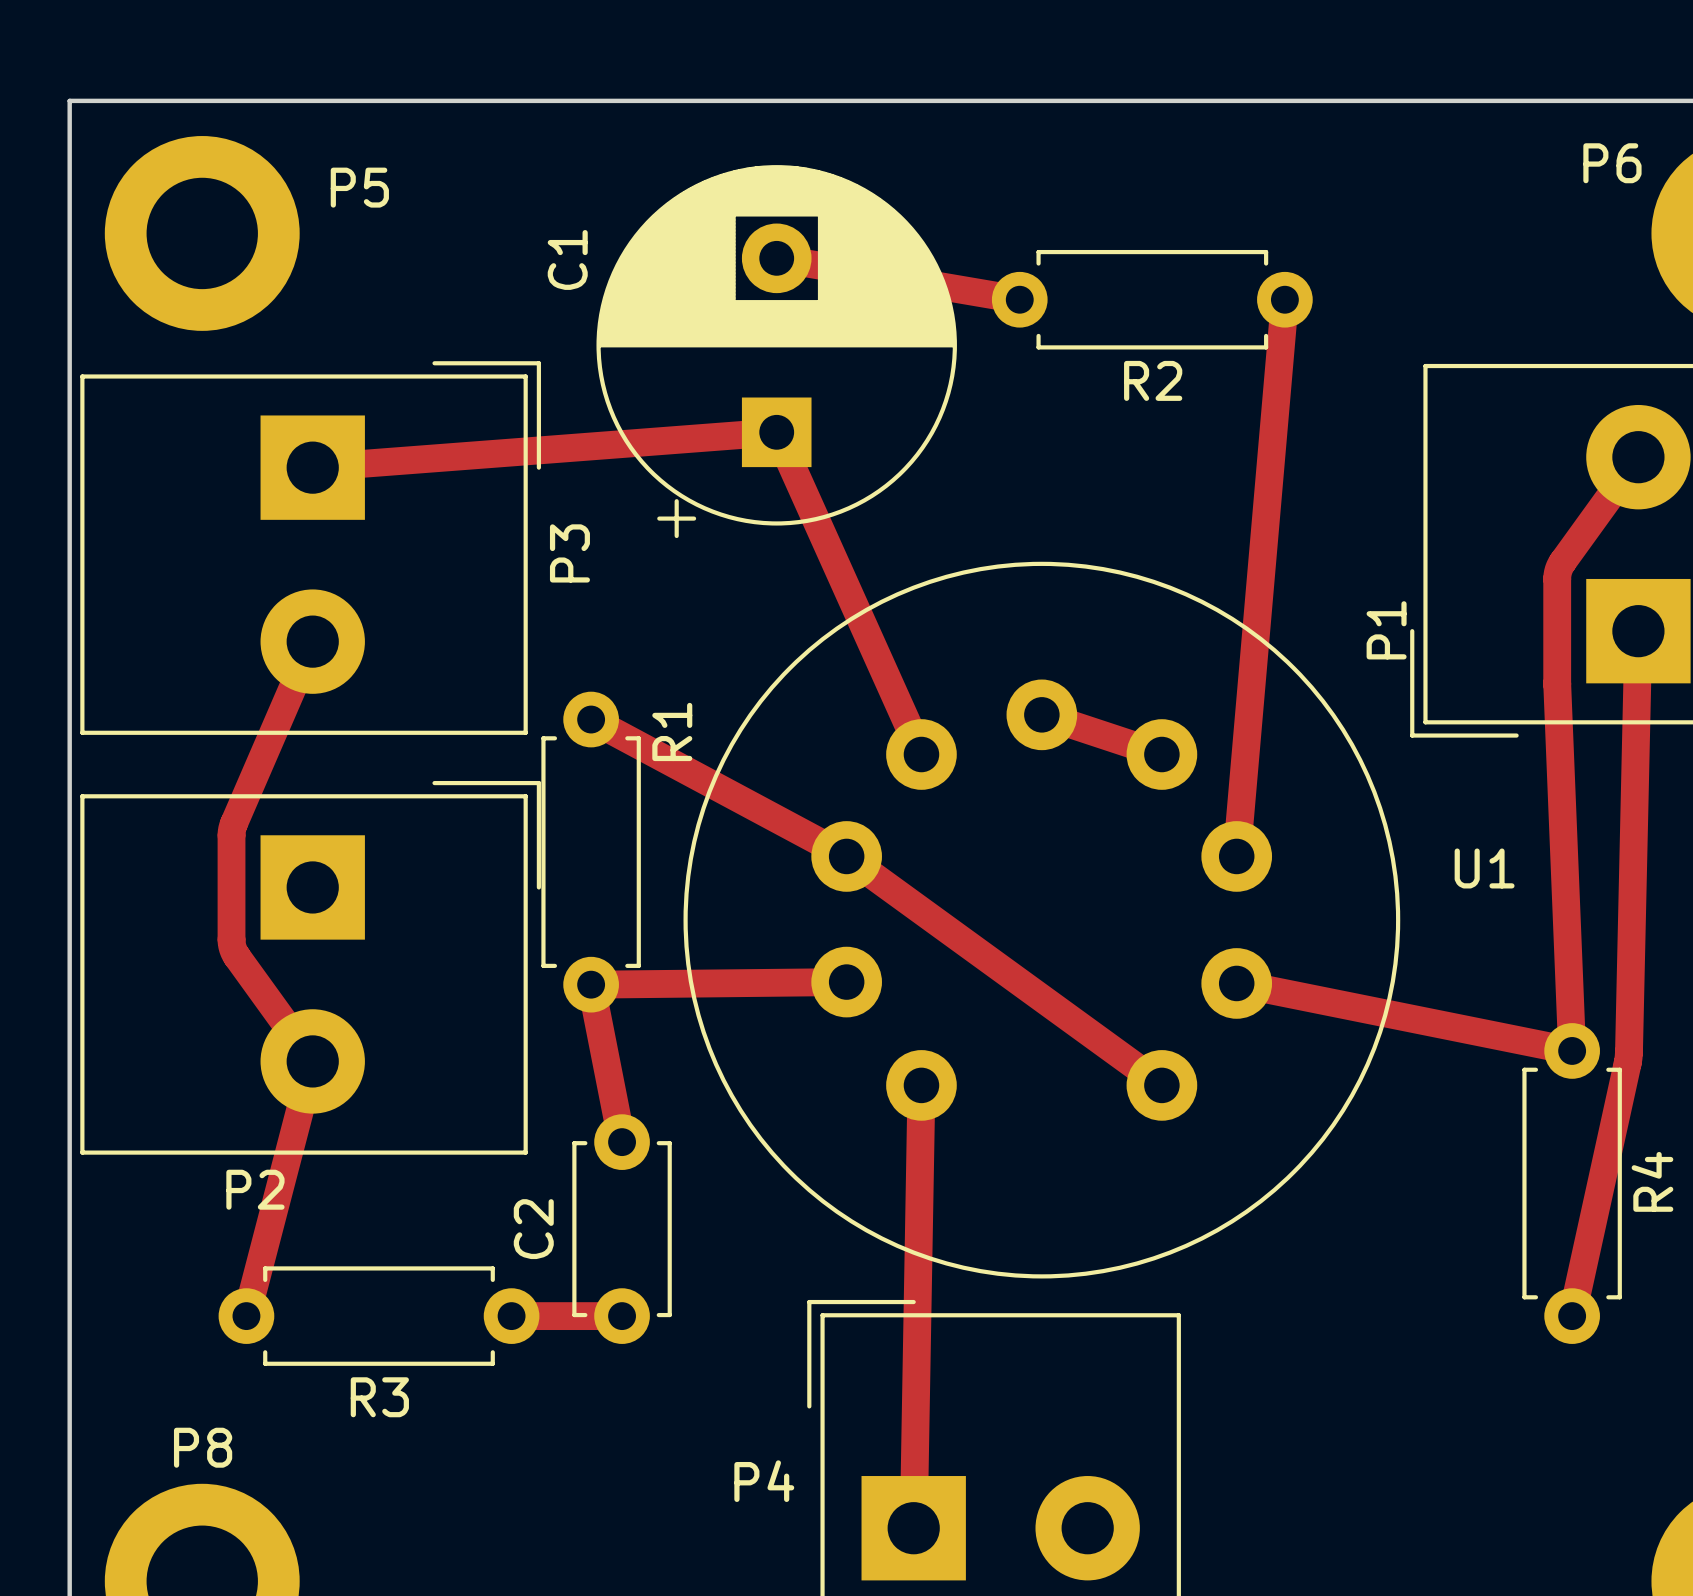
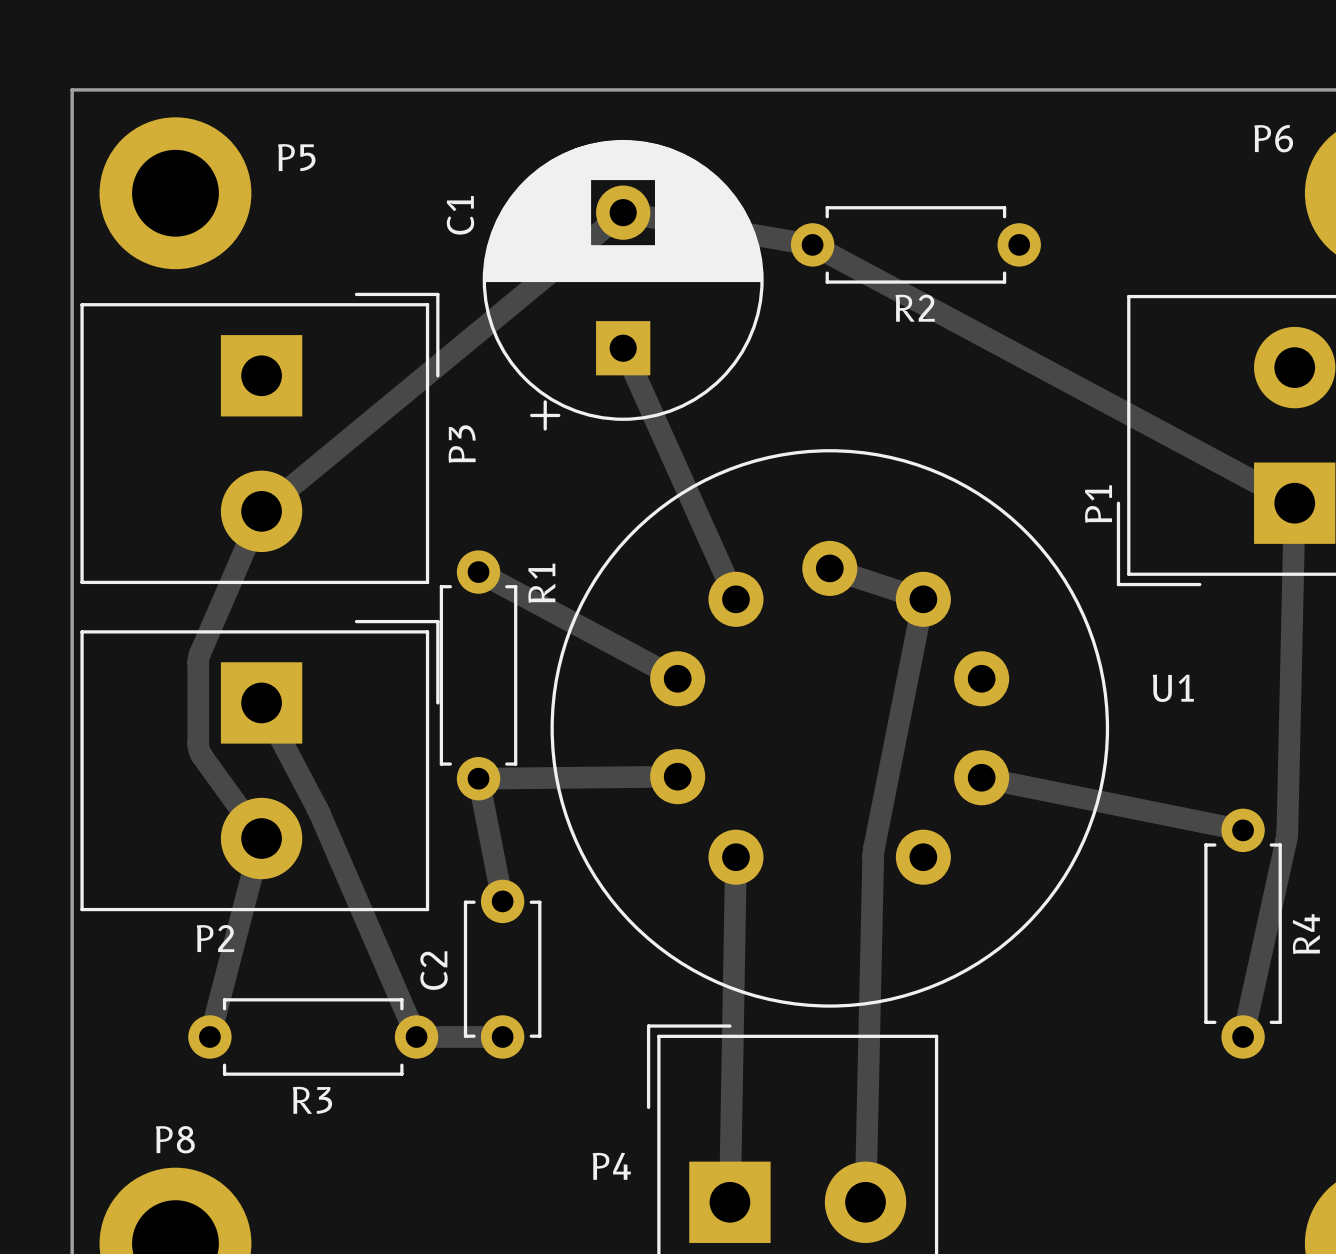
track: none -> (623, 212) (261, 511)
track: none -> (812, 244) (1294, 503)
track: (1284, 299) (1236, 856) -> none
track: (776, 432) (312, 467) -> none
track: (1638, 457) (1562, 561) (1557, 575) (1557, 684) (1572, 1050) -> none
track: none -> (923, 599) (873, 851) (865, 1202)
track: (846, 856) (1161, 1085) -> none
track: none -> (261, 702) (319, 813) (416, 1036)

